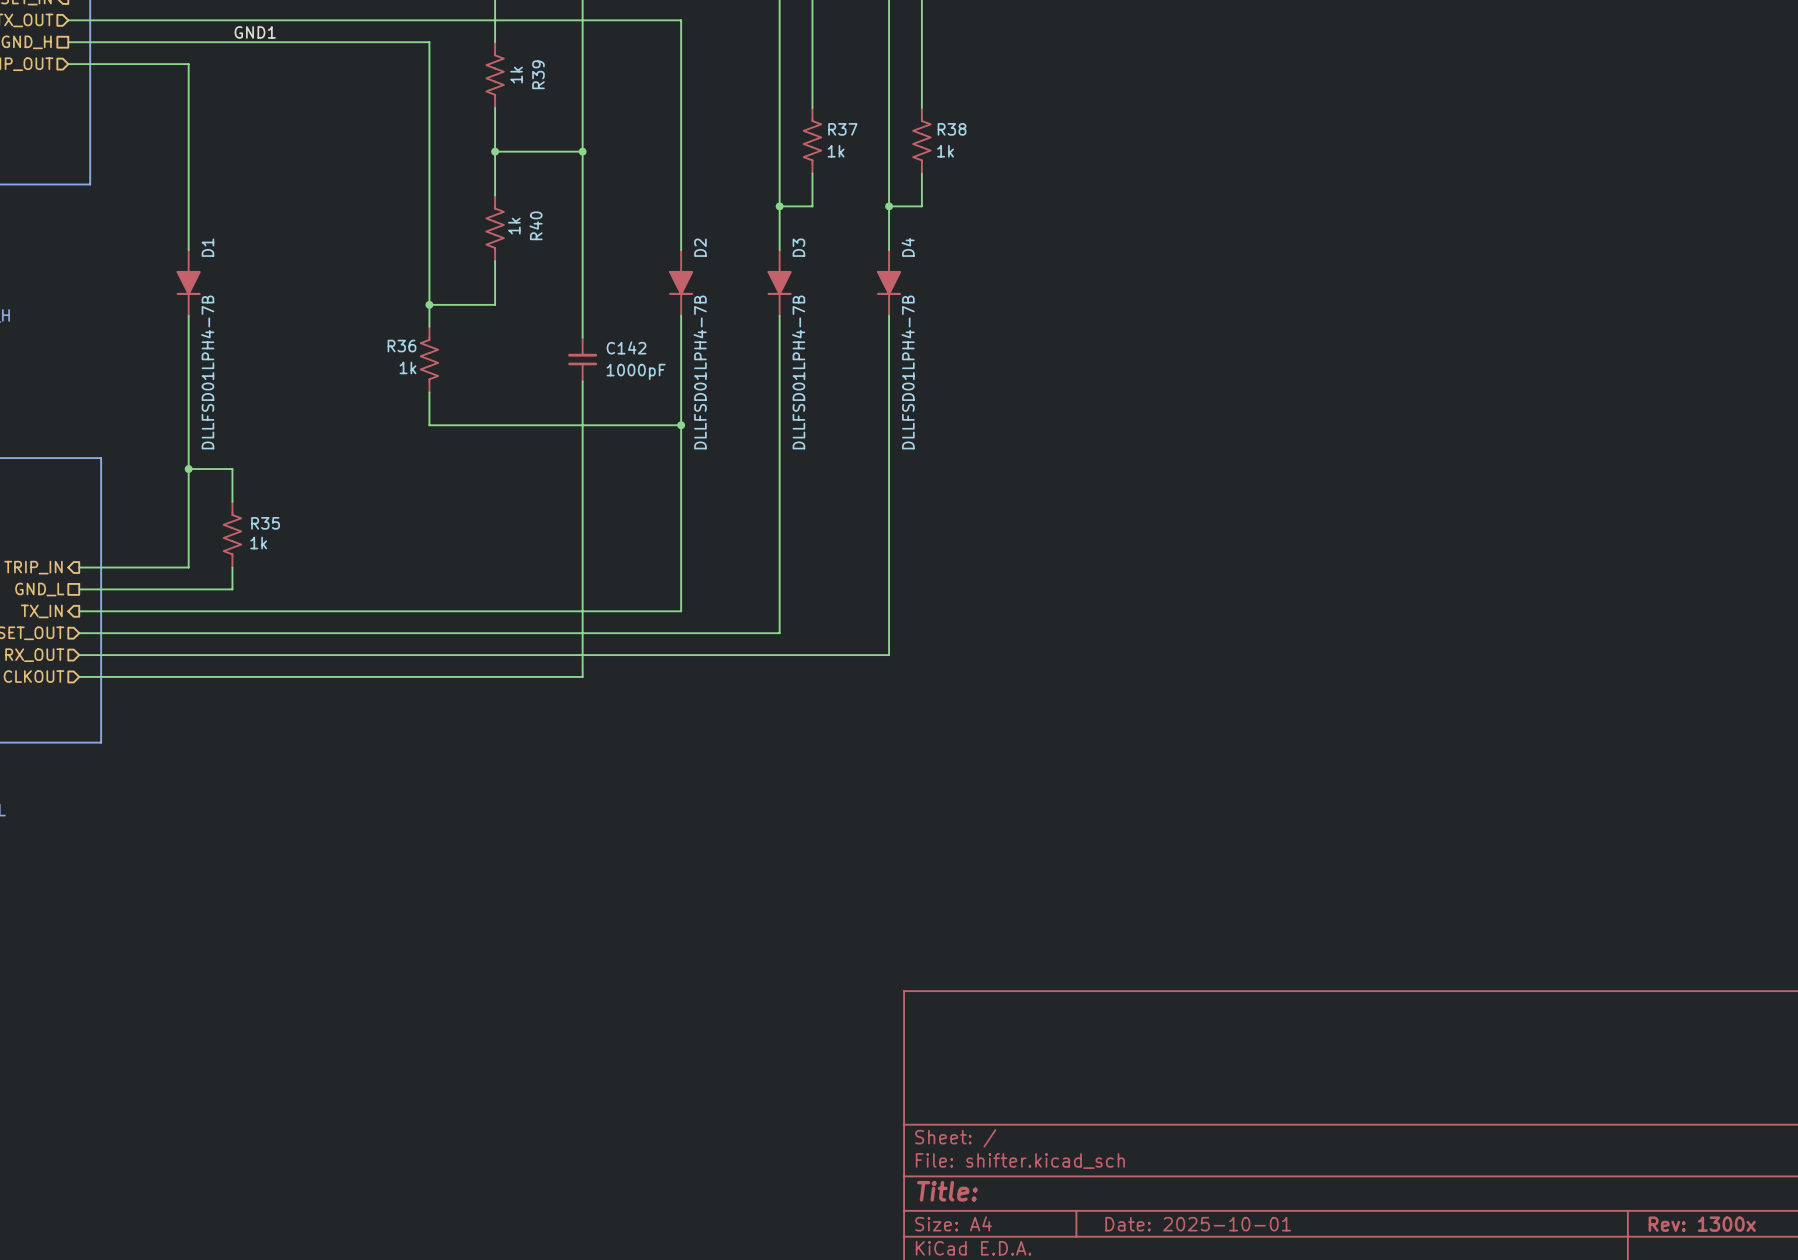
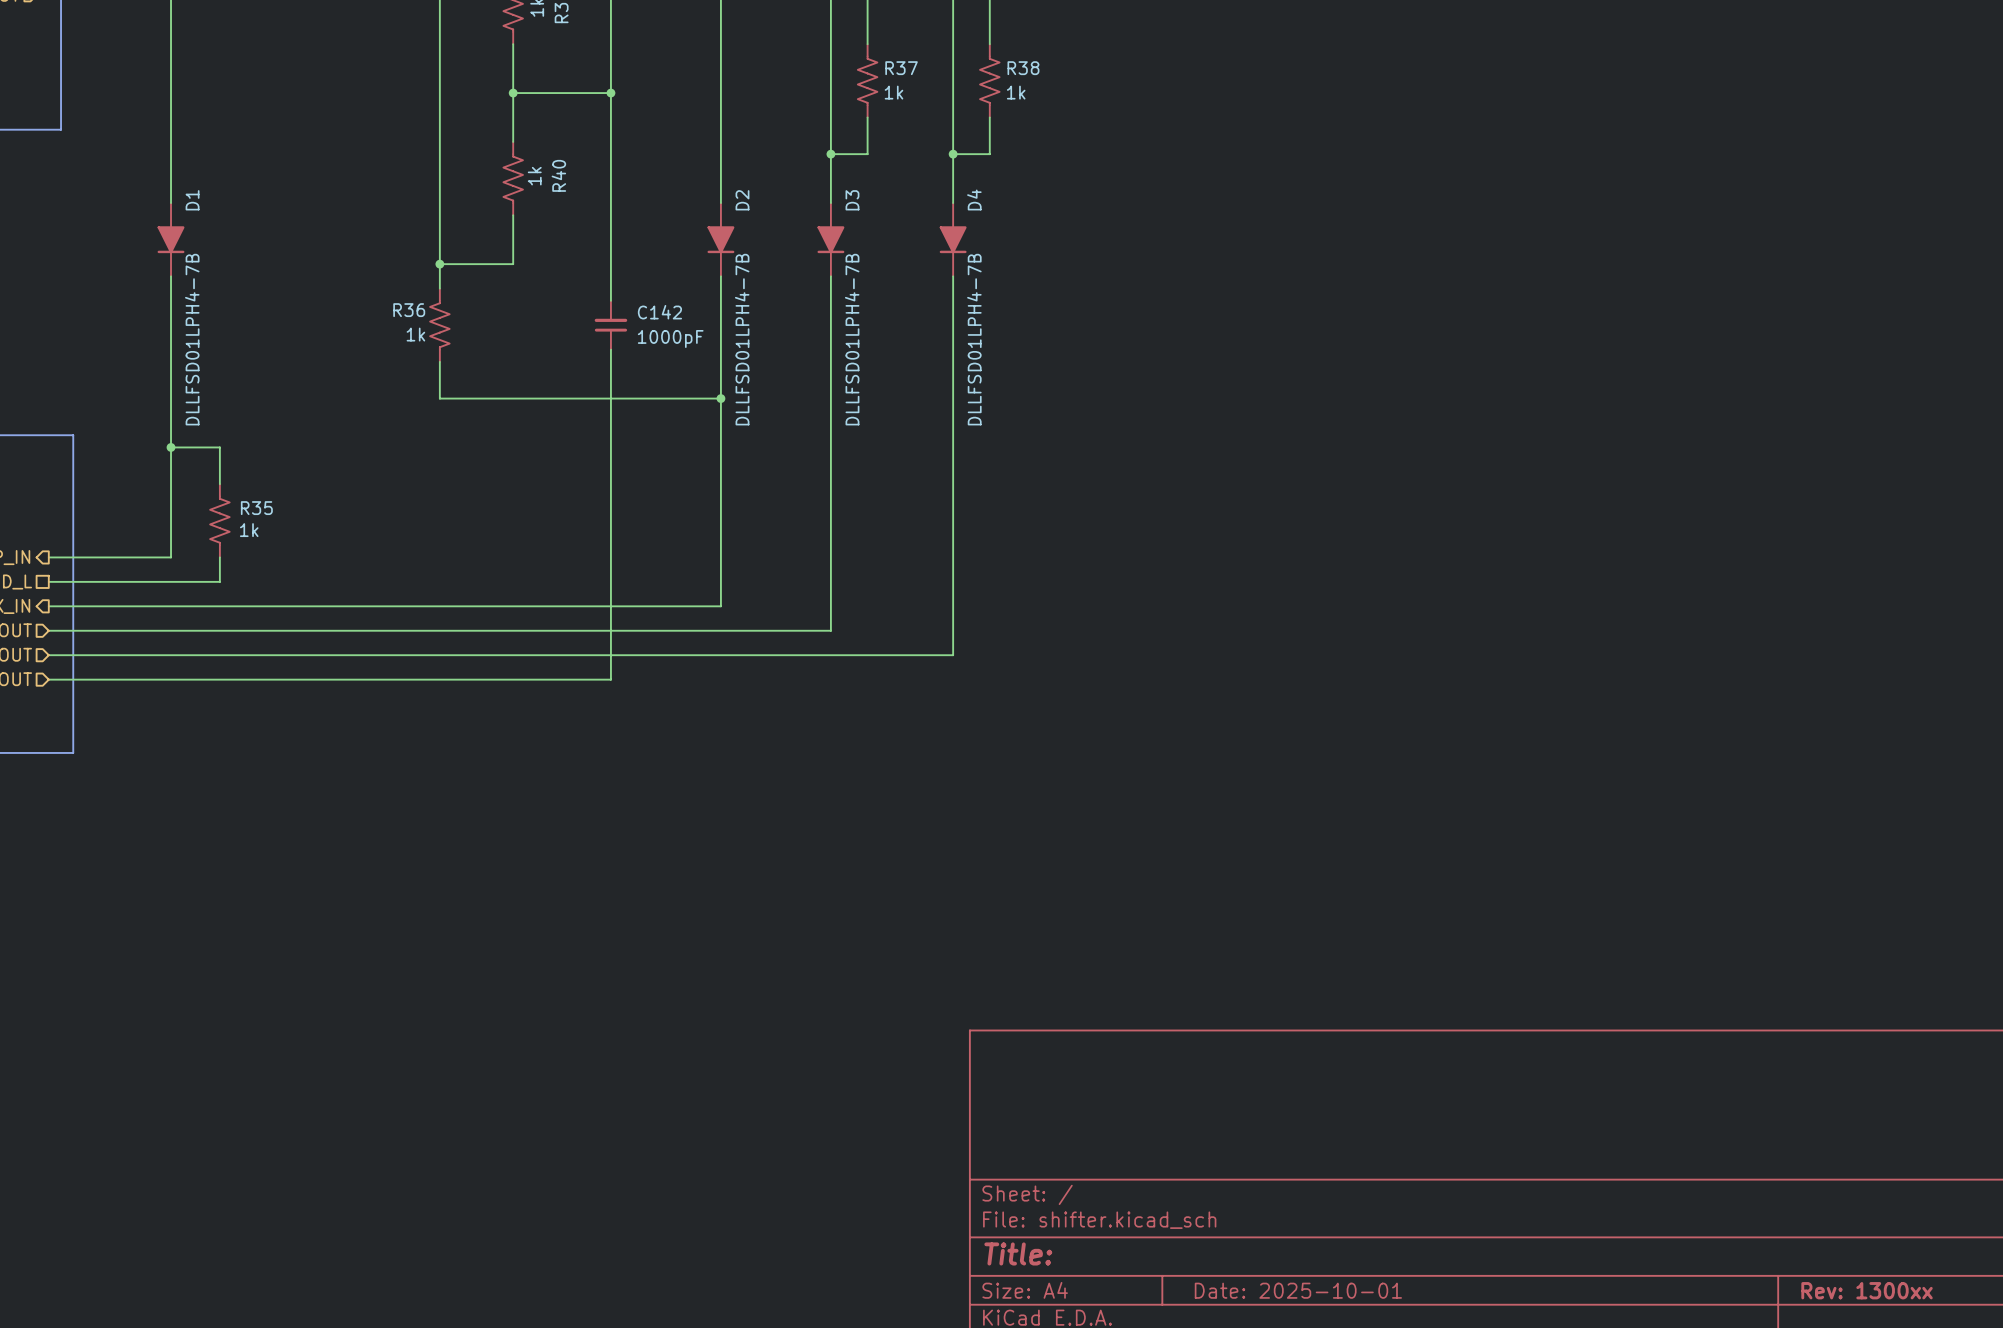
title block: Rev: 1300x (1702, 1224) -> Rev: 1300xx (1867, 1290)

